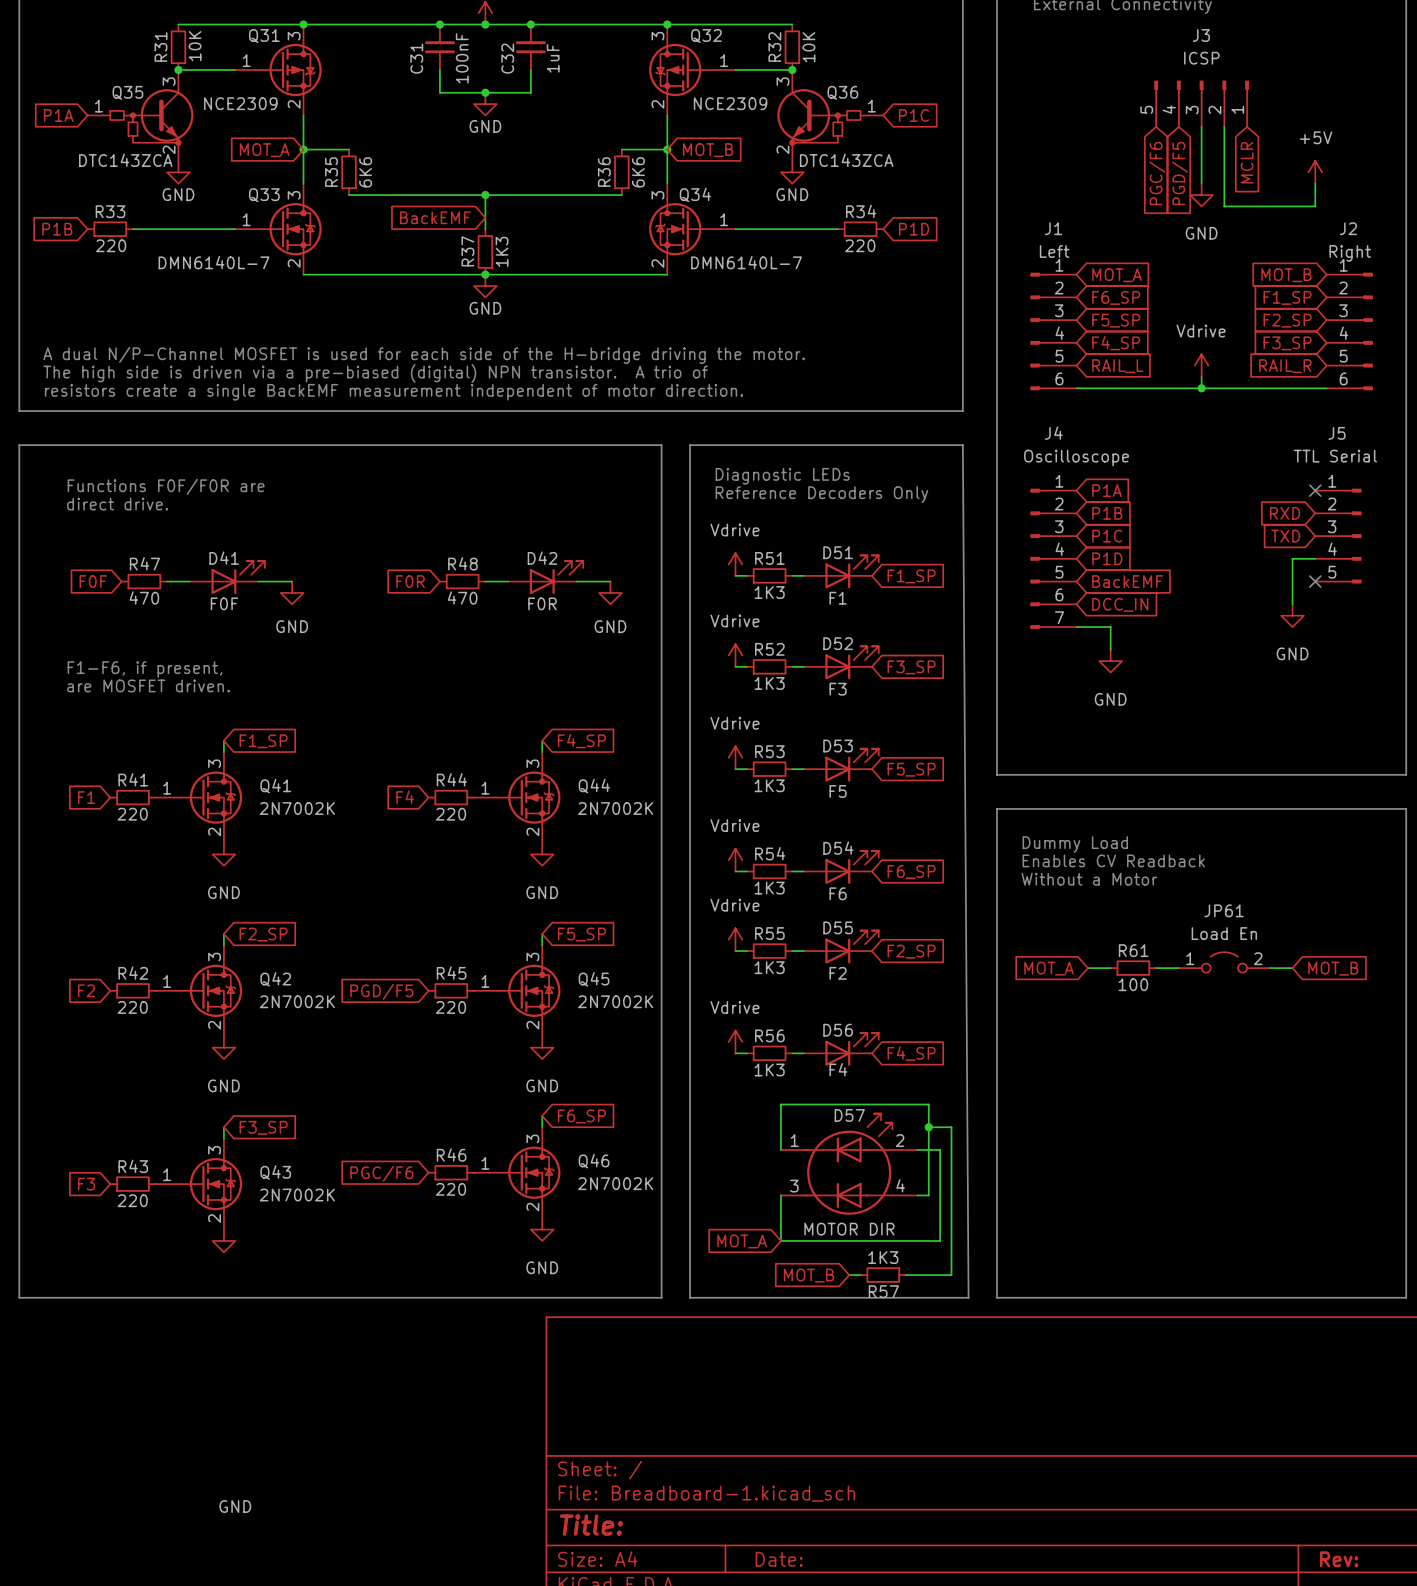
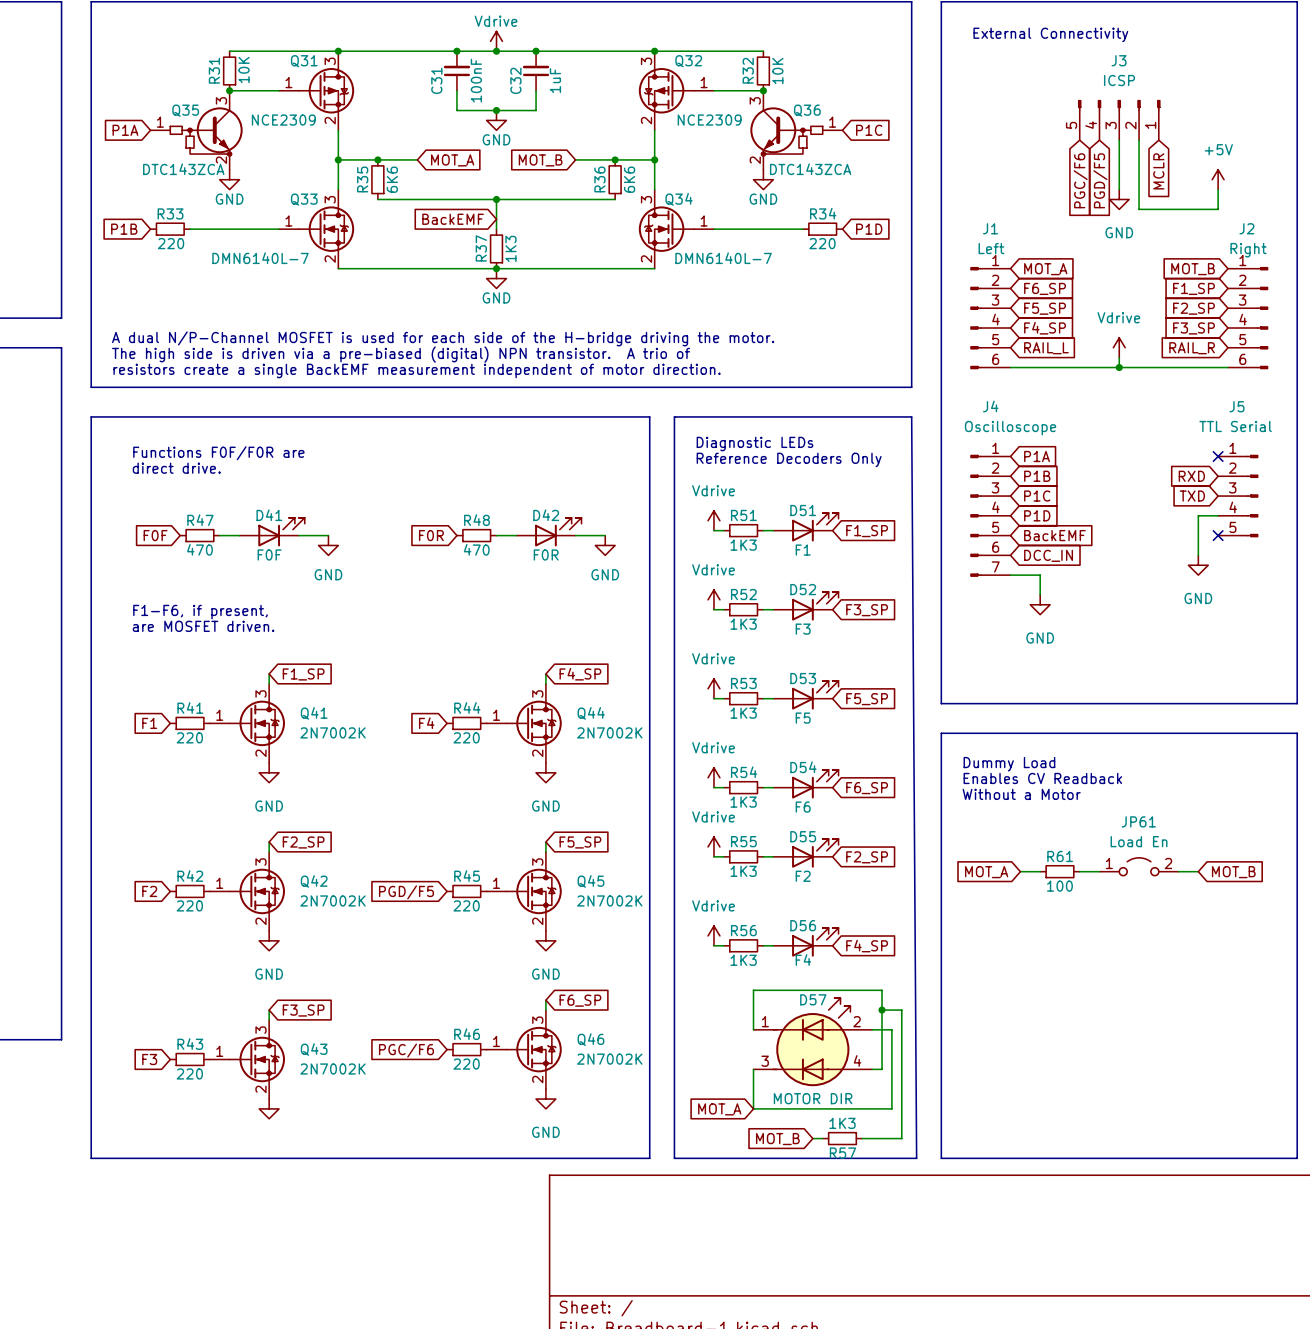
wire: none -> (377, 159) (417, 159)
junction: none -> (377, 159)
wire: none -> (575, 159) (615, 159)
junction: none -> (615, 159)
global label rotation: 0° (264, 150) -> 180° (452, 160)
global label position: MOT_A (264, 150) -> MOT_A (452, 160)
global label rotation: 0° (708, 150) -> 180° (540, 160)
global label position: MOT_B (708, 150) -> MOT_B (540, 160)

